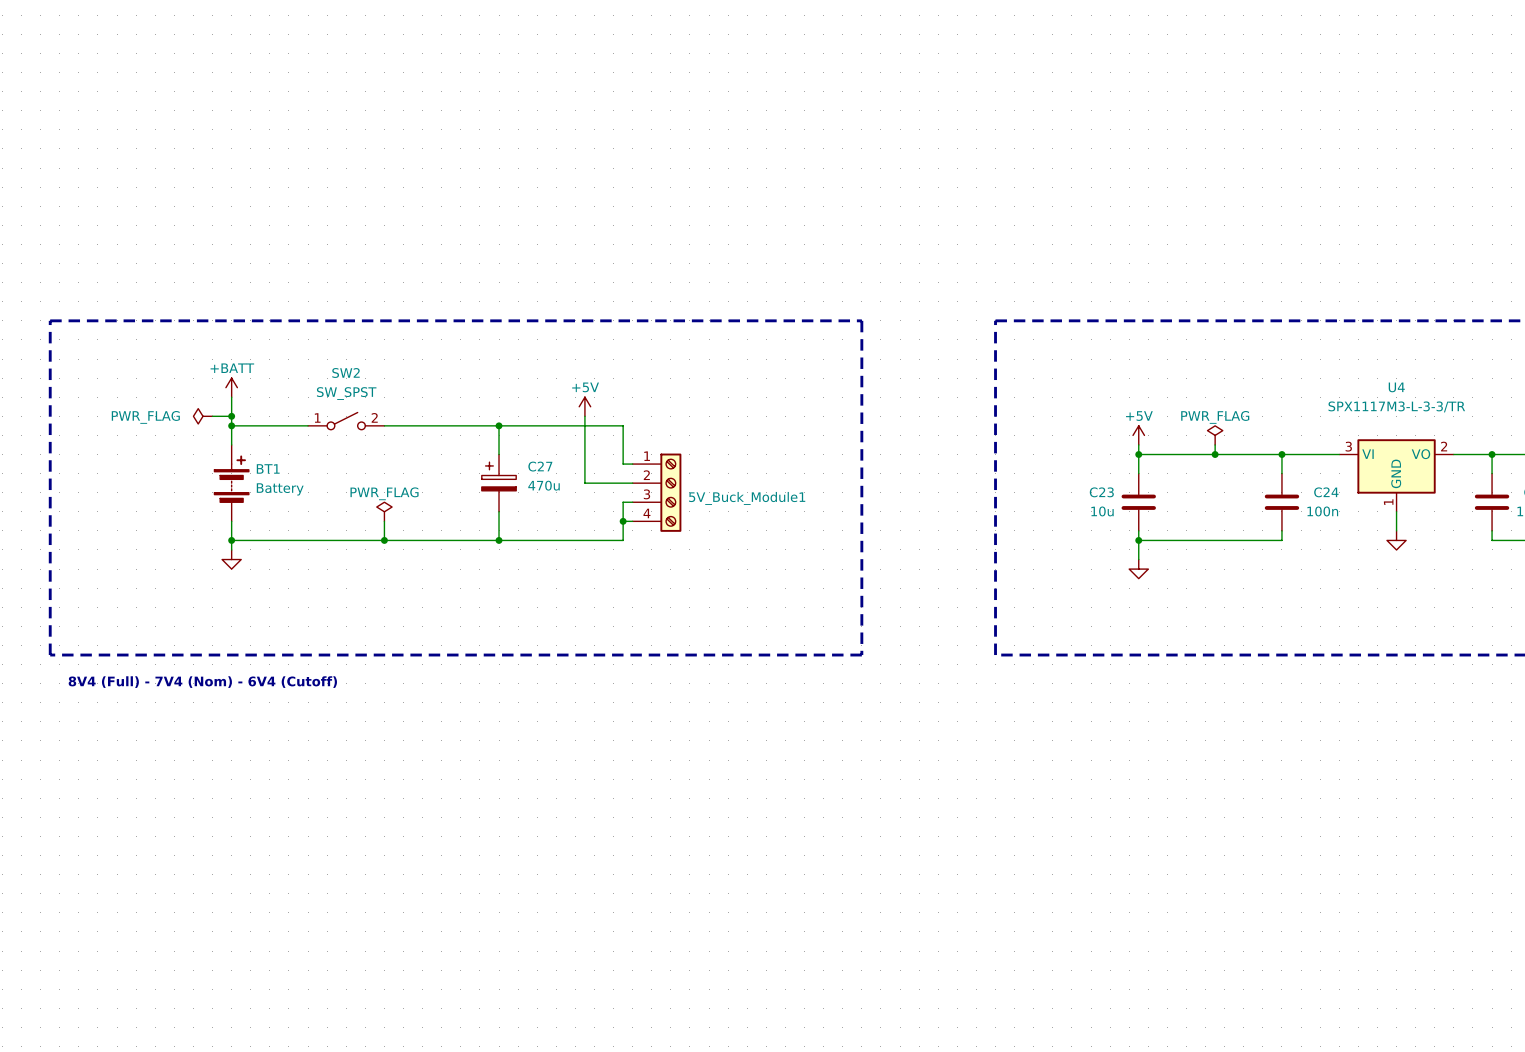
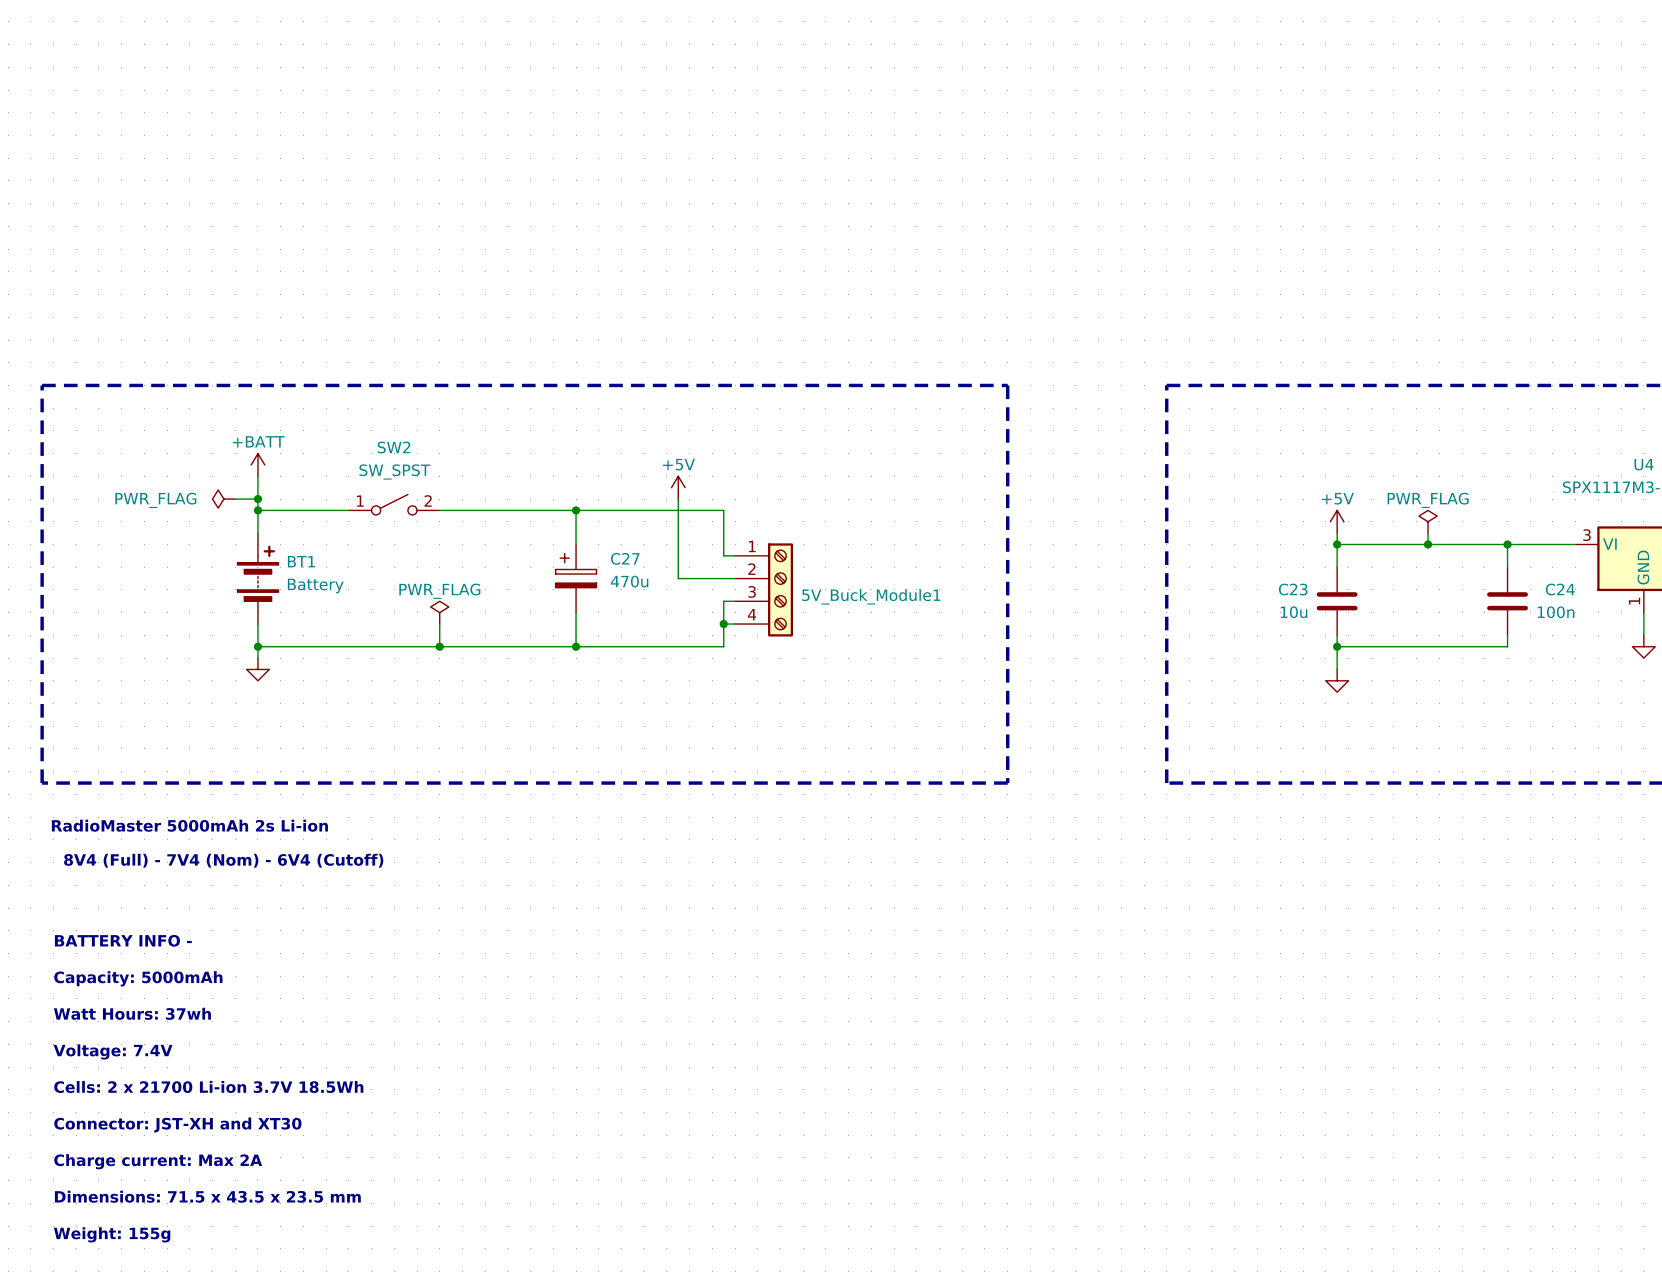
text position: 8V4 (Full) - 7V4 (Nom) - 6V4 (Cutoff) (202, 682) -> 8V4 (Full) - 7V4 (Nom) - 6V4 (Cutoff) (223, 860)
text: none -> RadioMaster 5000mAh 2s Li-ion (189, 825)
text: none -> BATTERY INFO - (123, 940)
text: none -> Capacity: 5000mAh (138, 978)
text: none -> Watt Hours: 37wh (132, 1013)
text: none -> Voltage: 7.4V (113, 1051)
text: none -> Cells: 2 x 21700 Li-ion 3.7V 18.5Wh (208, 1086)
text: none -> Connector: JST-XH and XT30 (177, 1125)
text: none -> Charge current: Max 2A (158, 1161)
text: none -> Dimensions: 71.5 x 43.5 x 23.5 mm (207, 1196)
text: none -> Weight: 155g (112, 1234)

